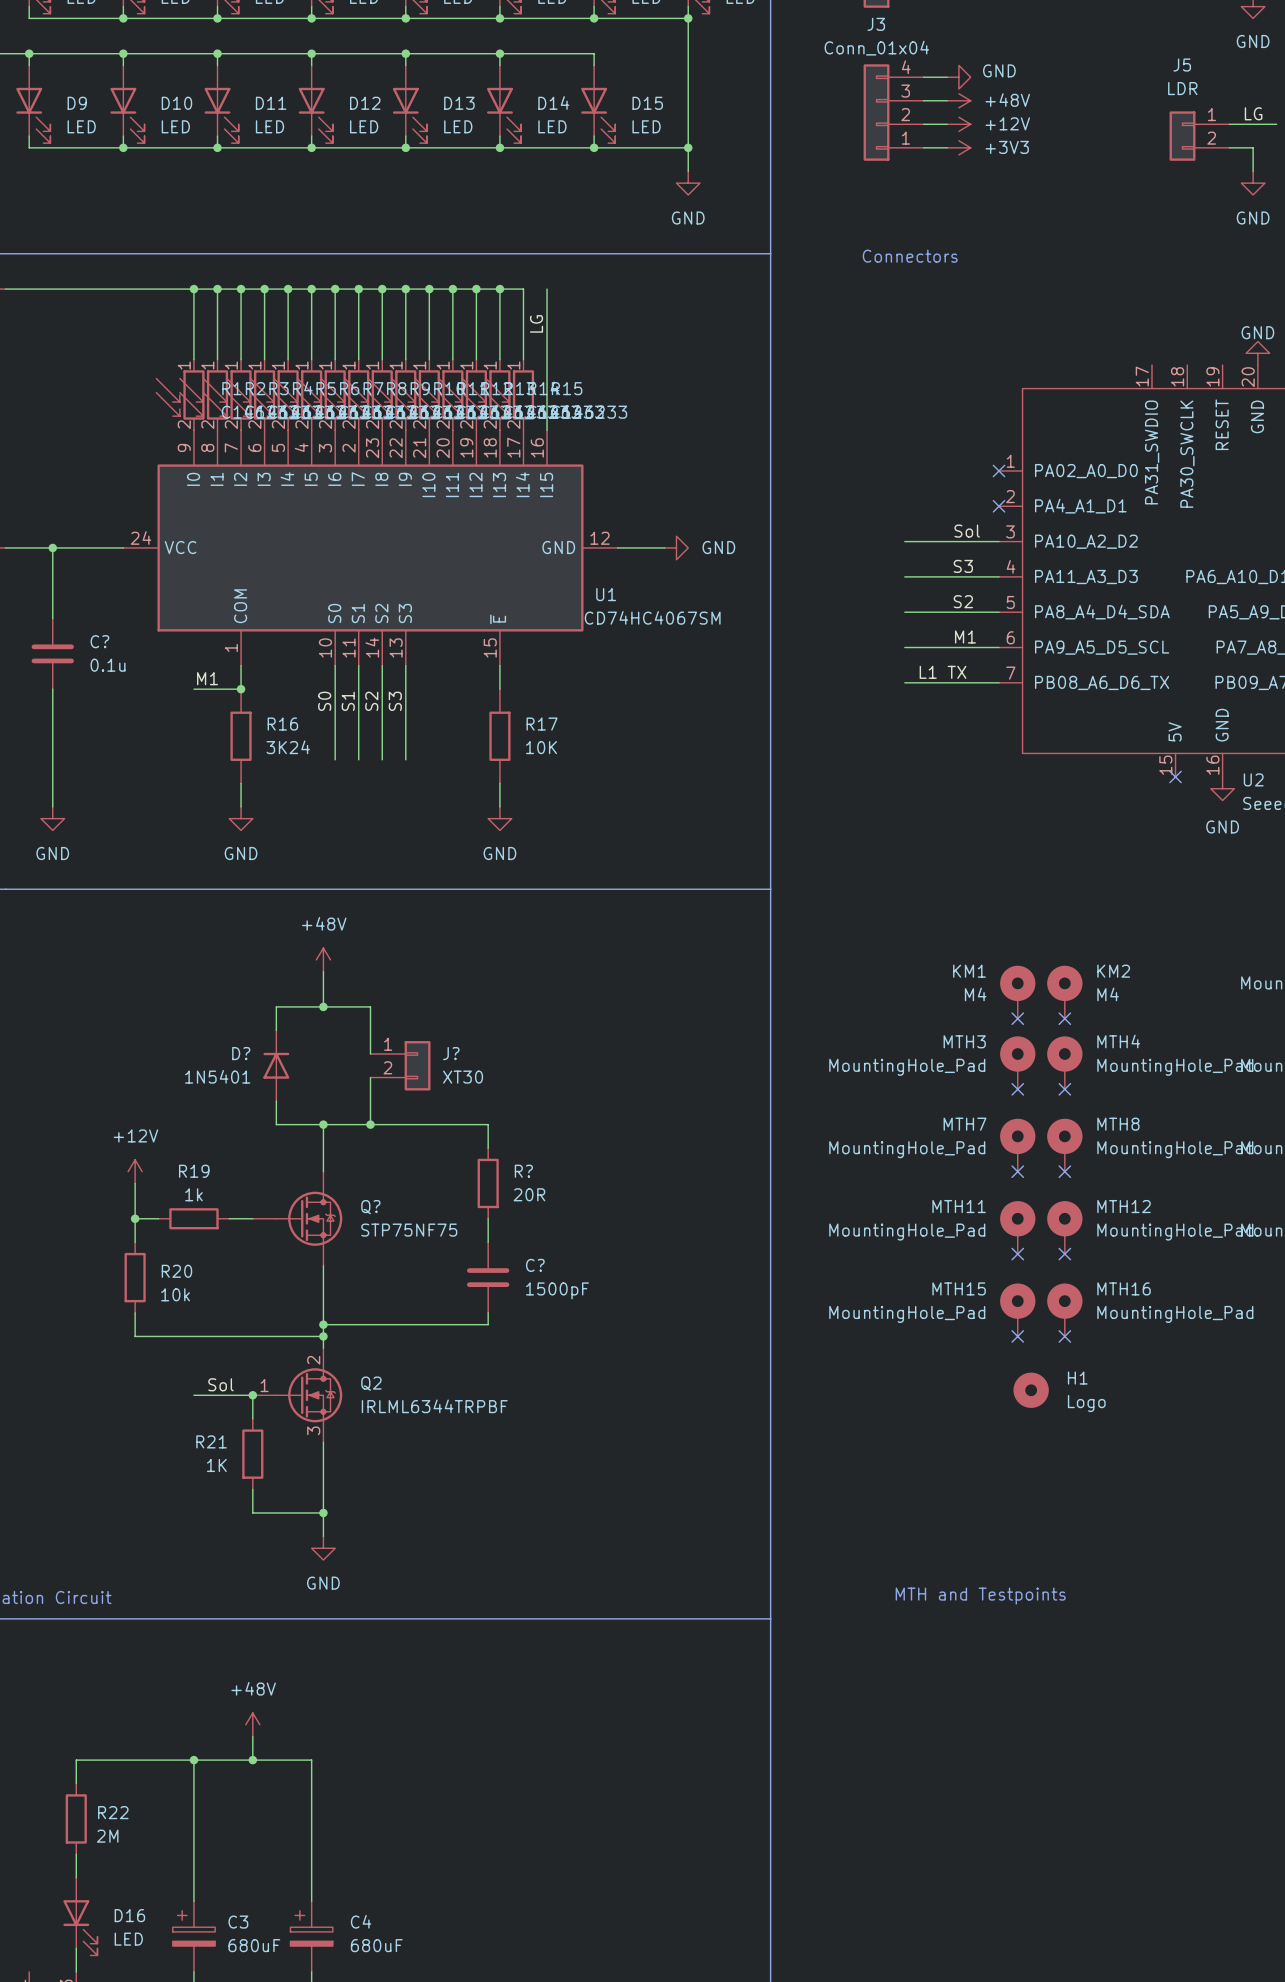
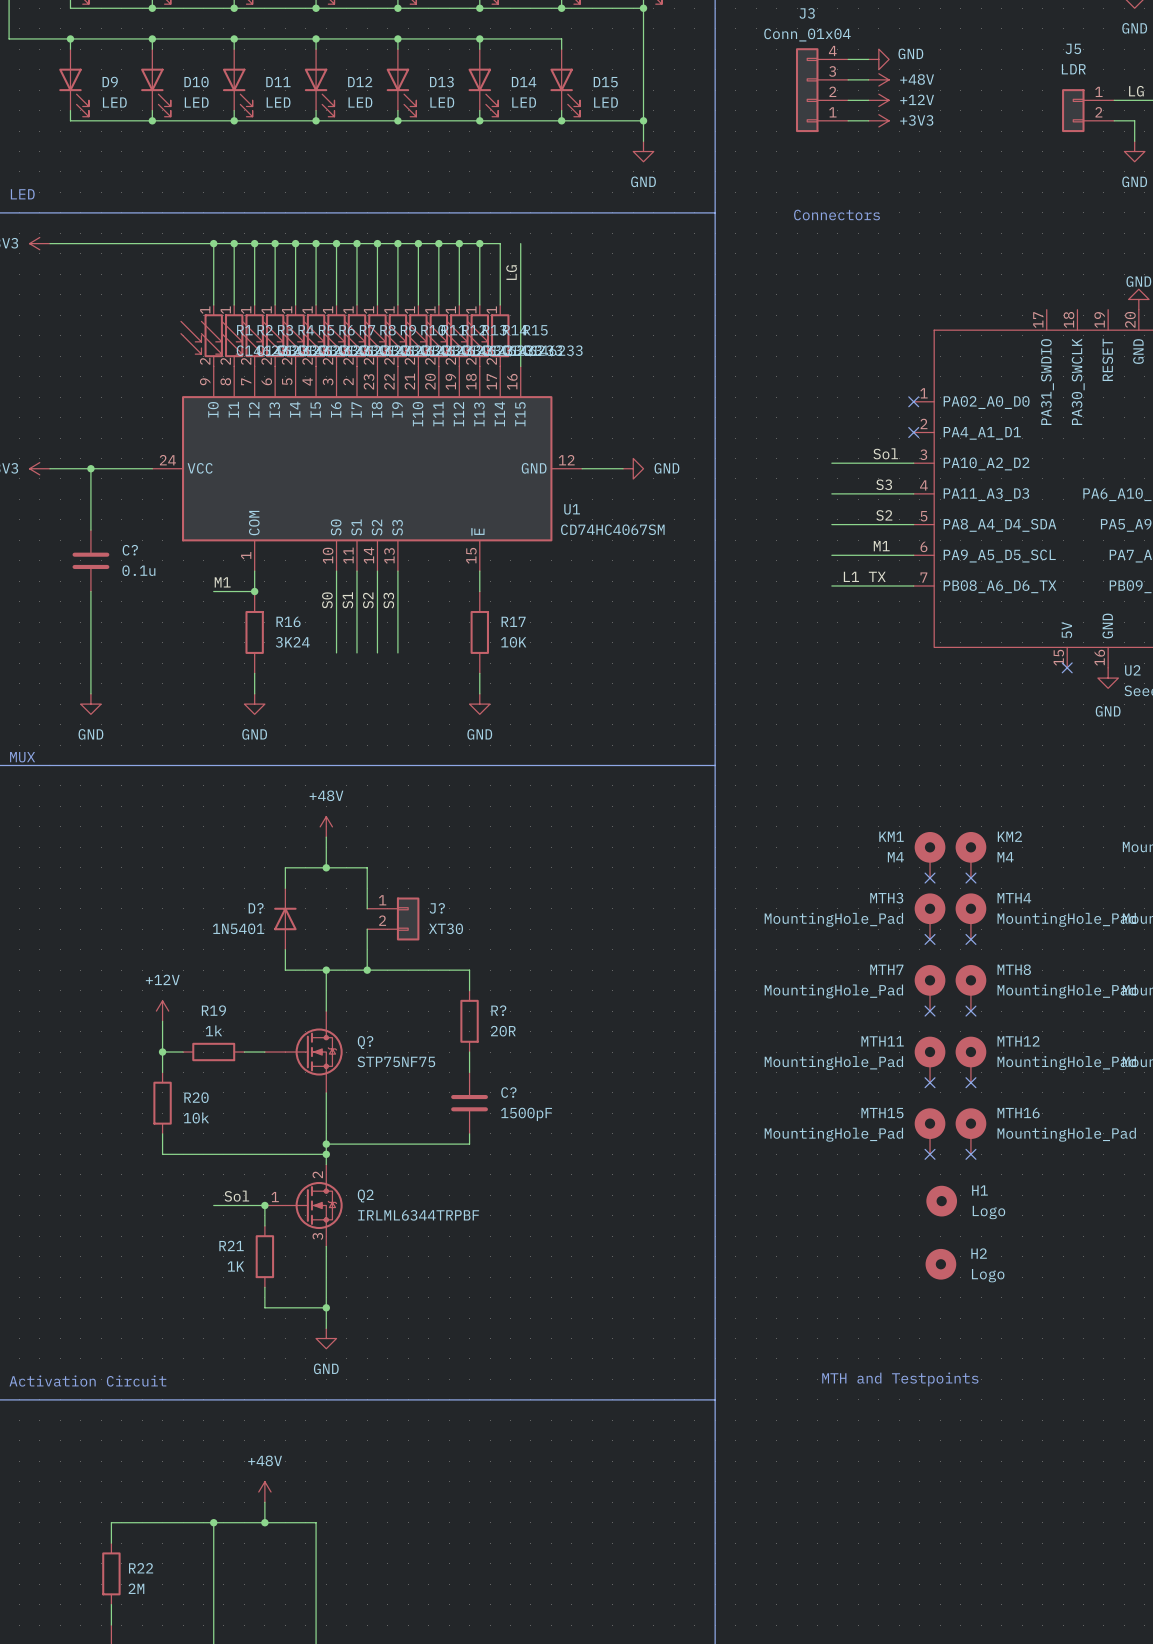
H2: none -> Logo (940, 1264)

